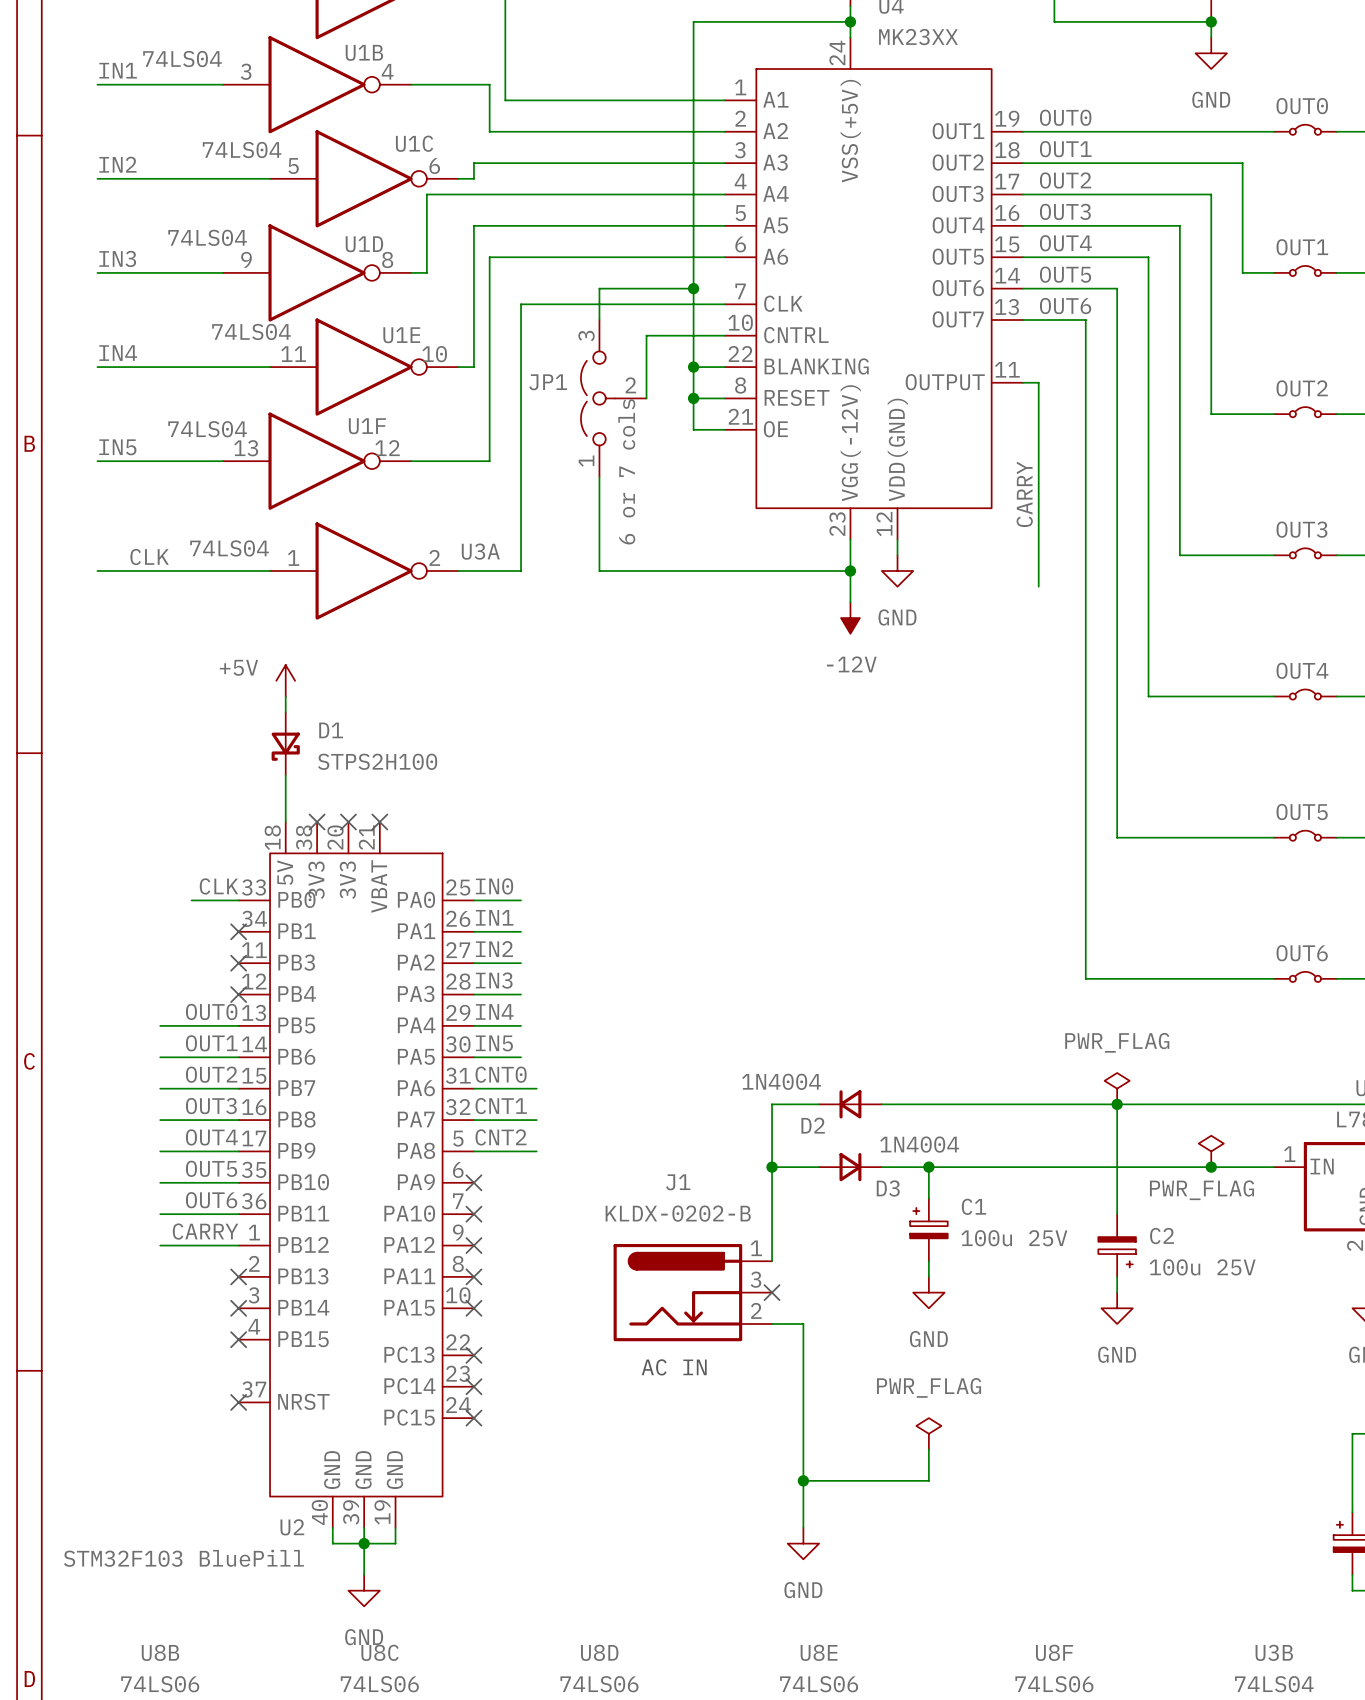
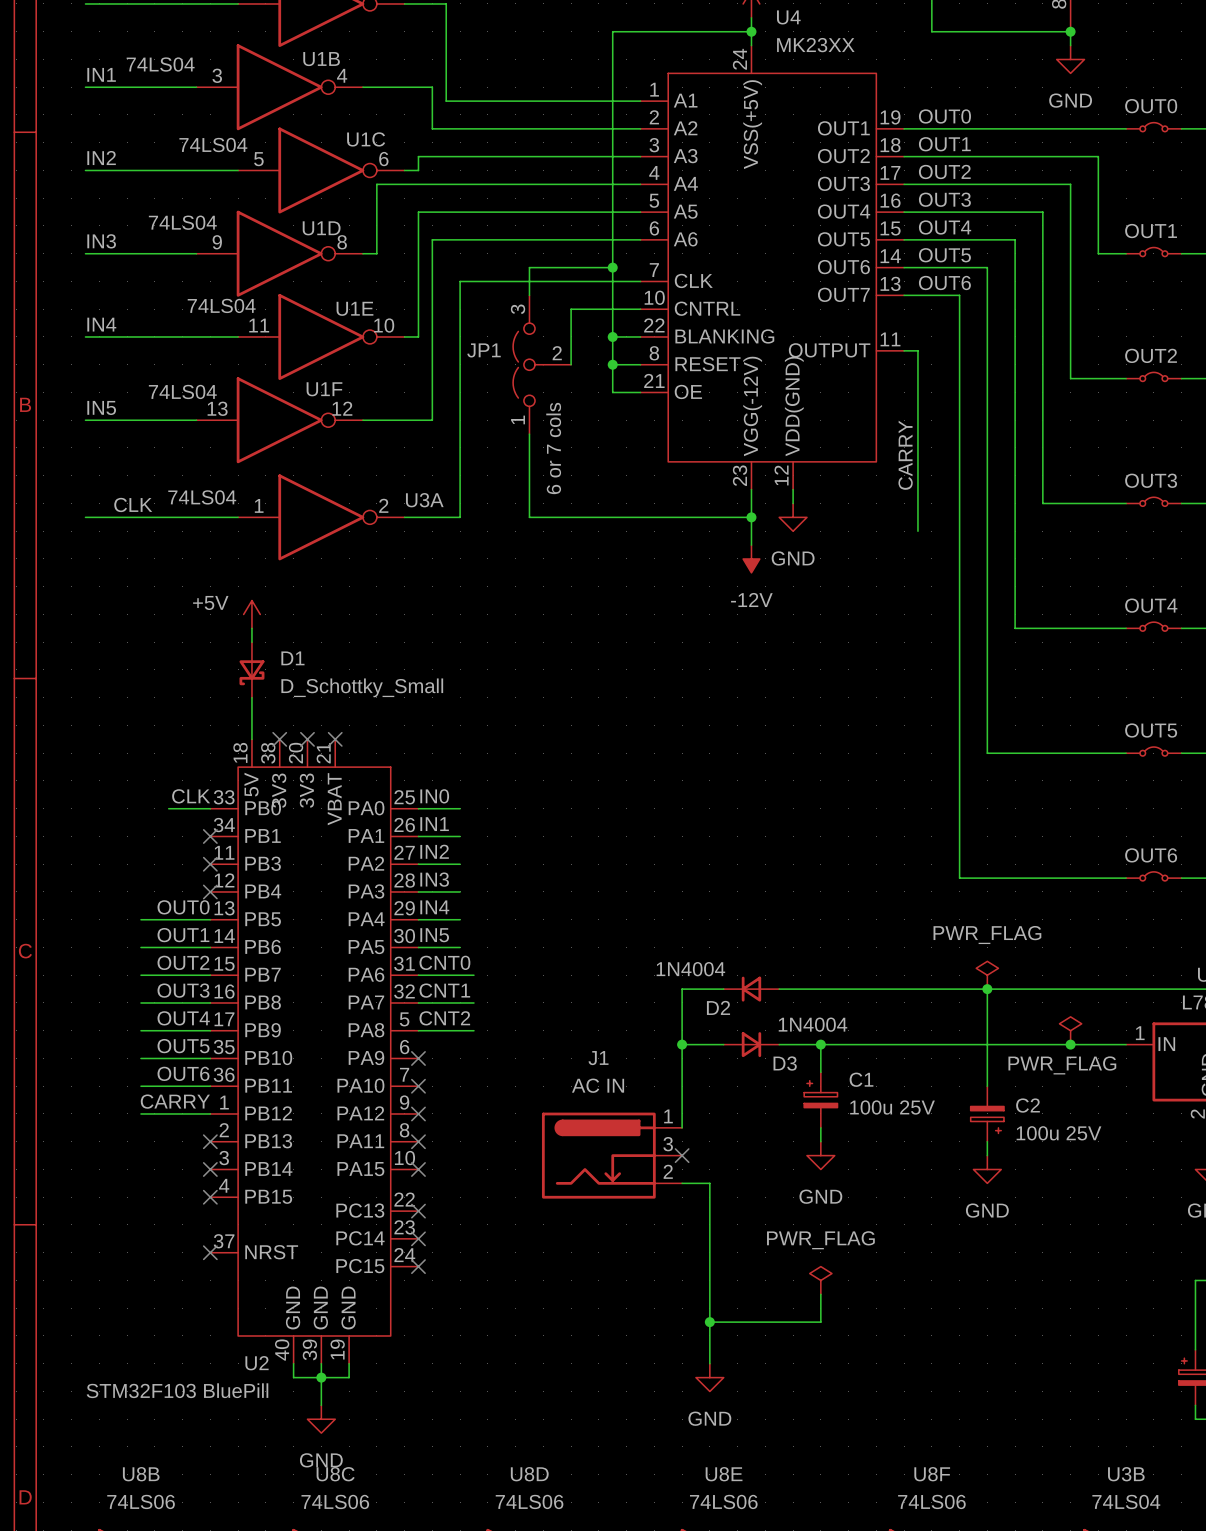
D1 value: STPS2H100 (377, 761) -> D_Schottky_Small (362, 687)
J1 value: KLDX-0202-B (678, 1213) -> AC IN (598, 1085)
text: AC IN (674, 1367) -> none

